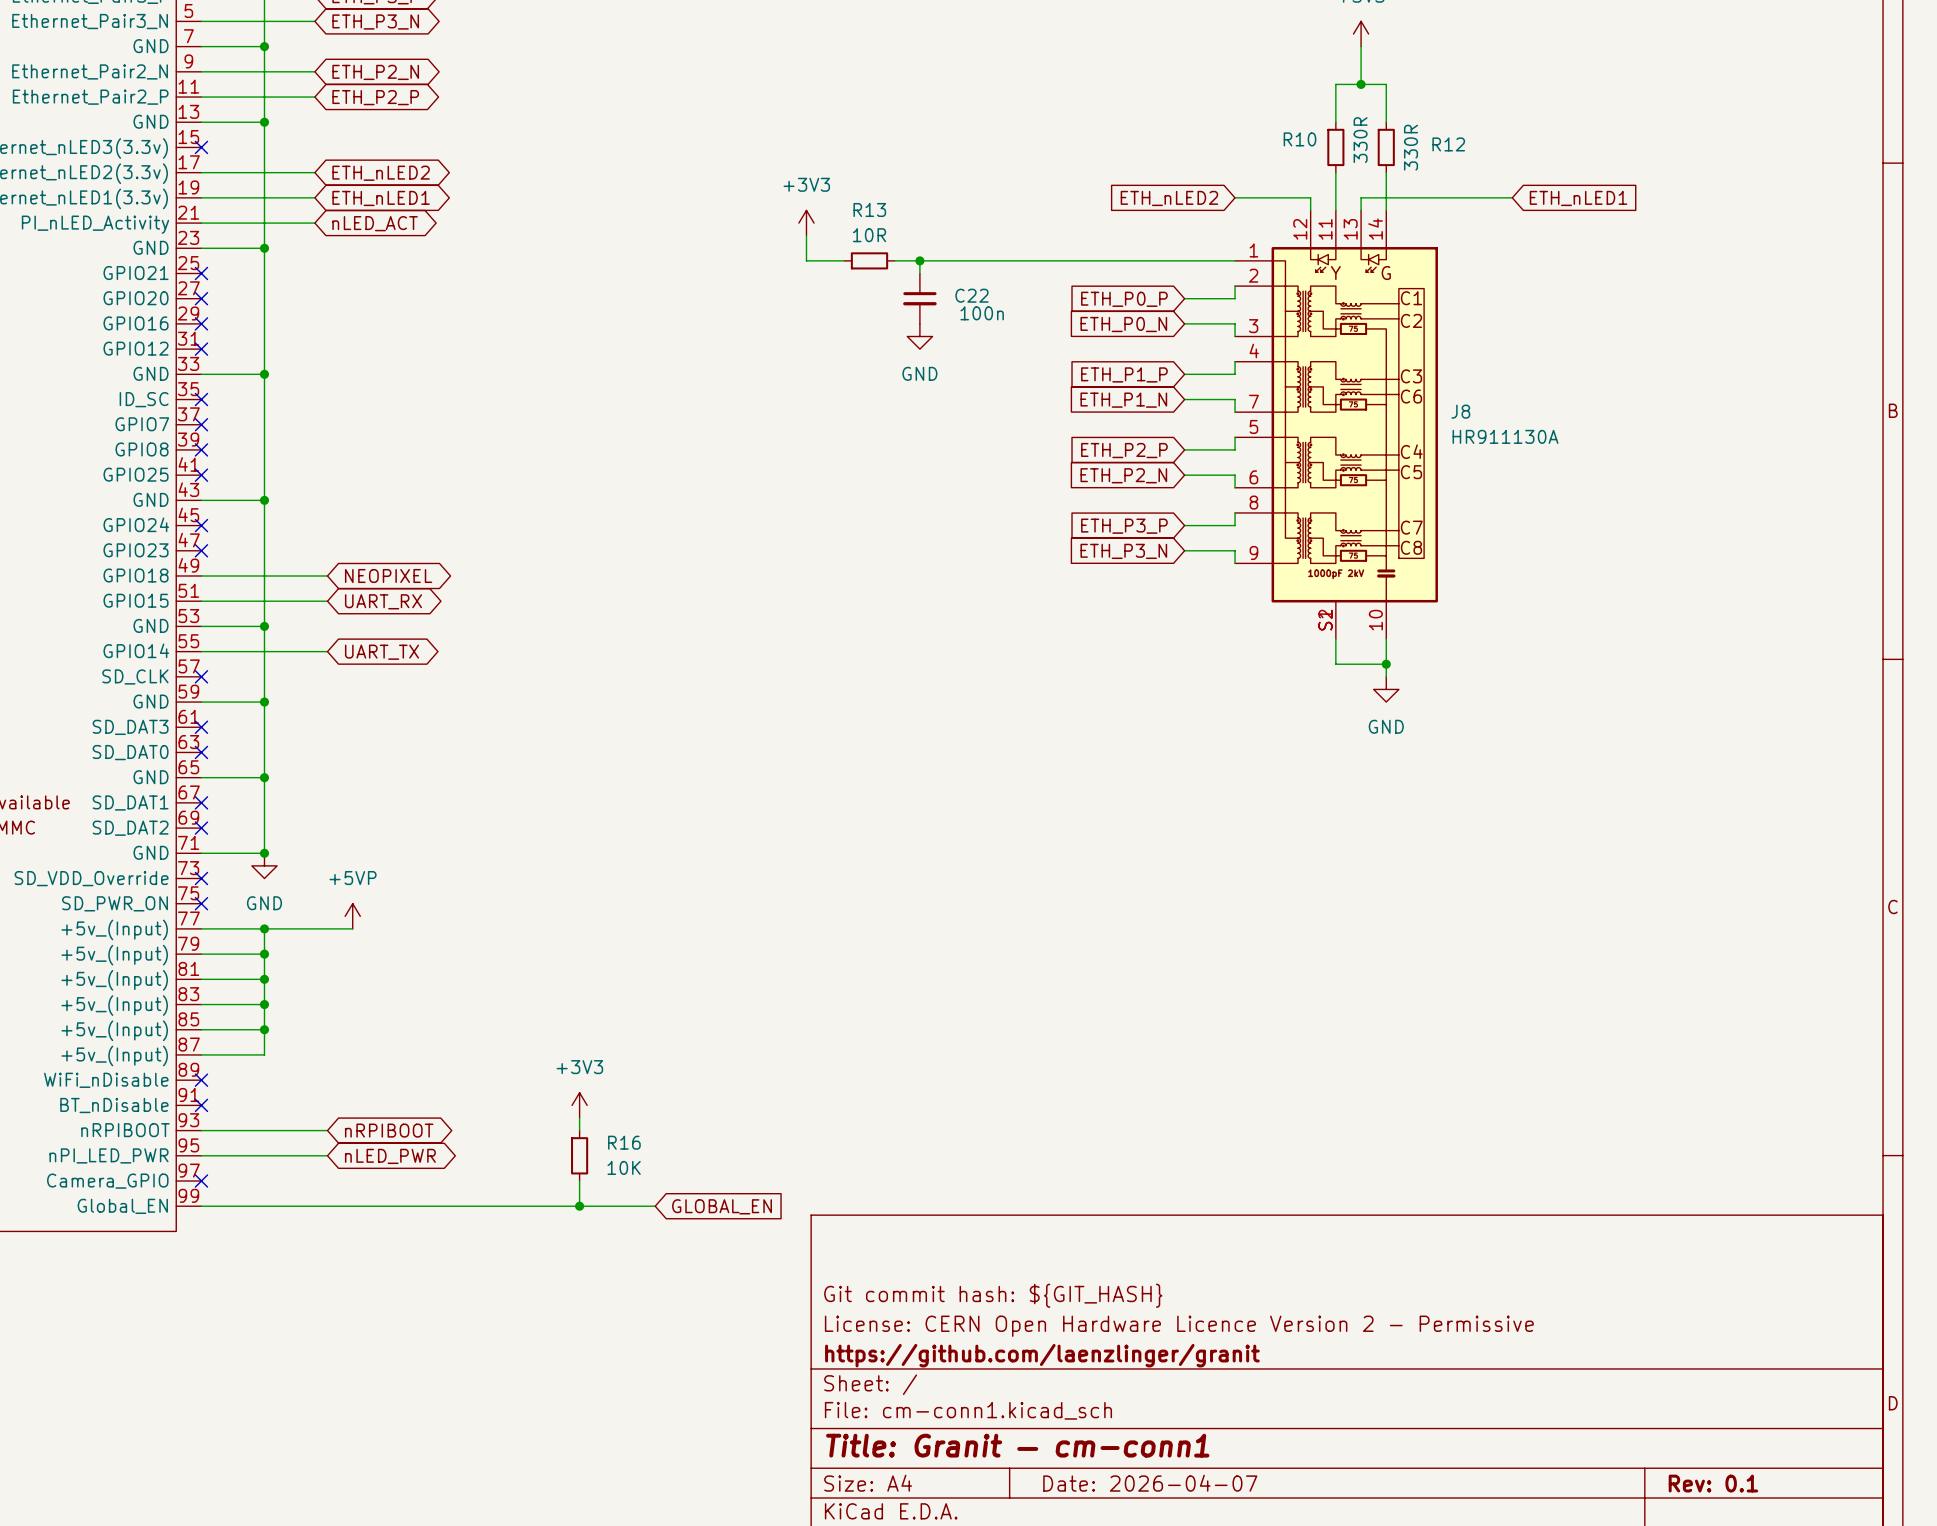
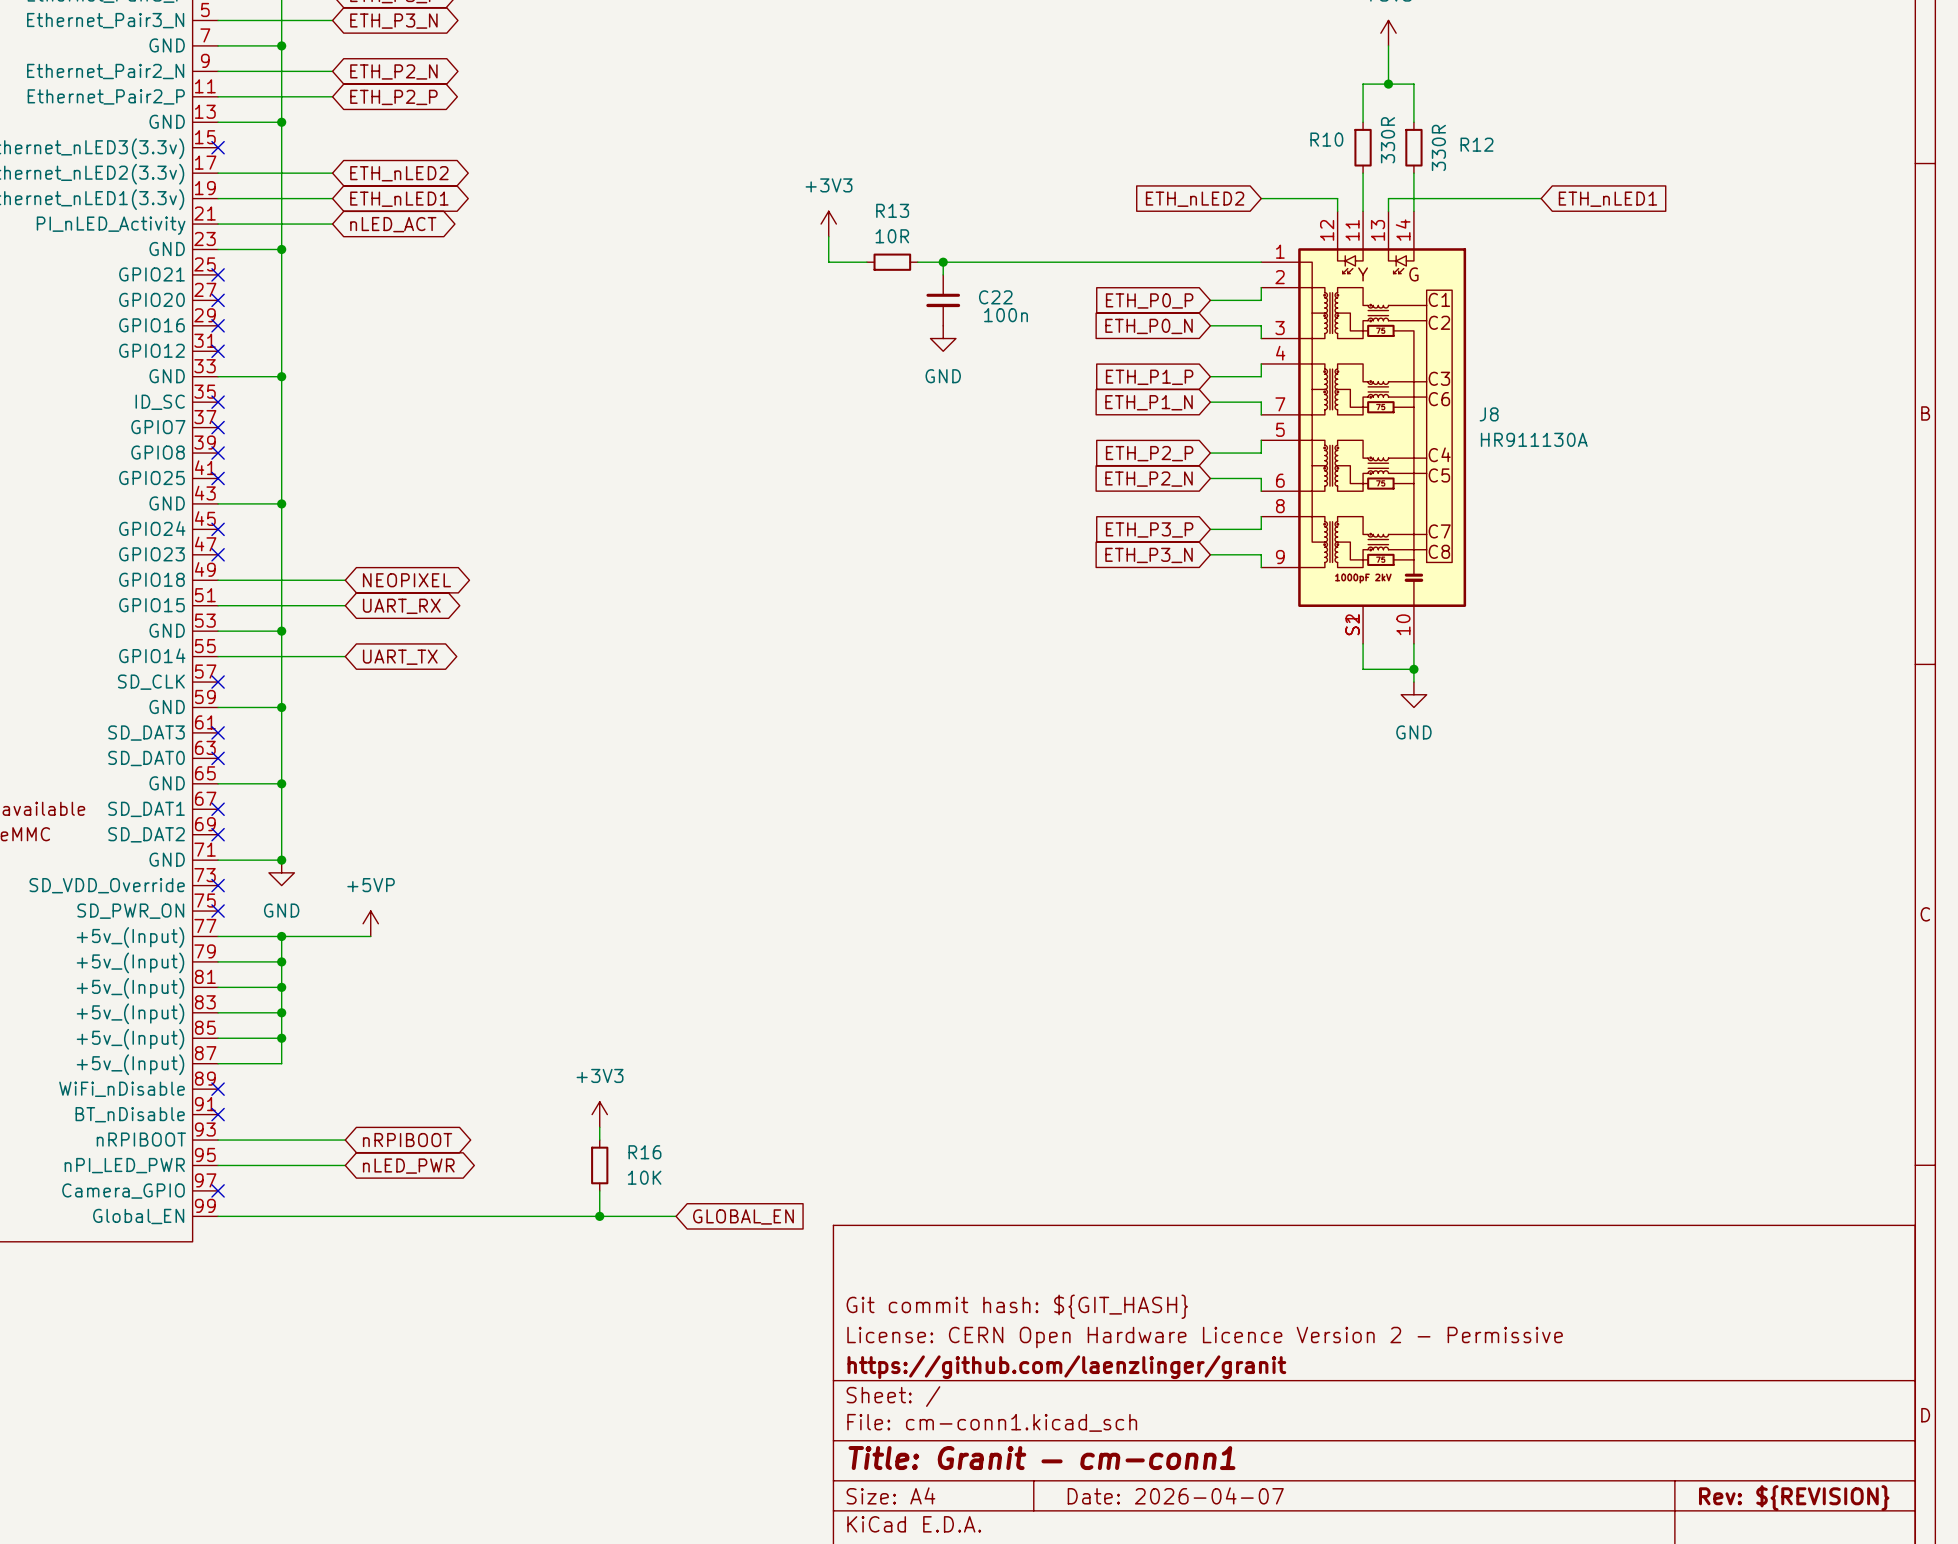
title block: Rev: 0.1 (1713, 1483) -> Rev: ${REVISION} (1794, 1498)

